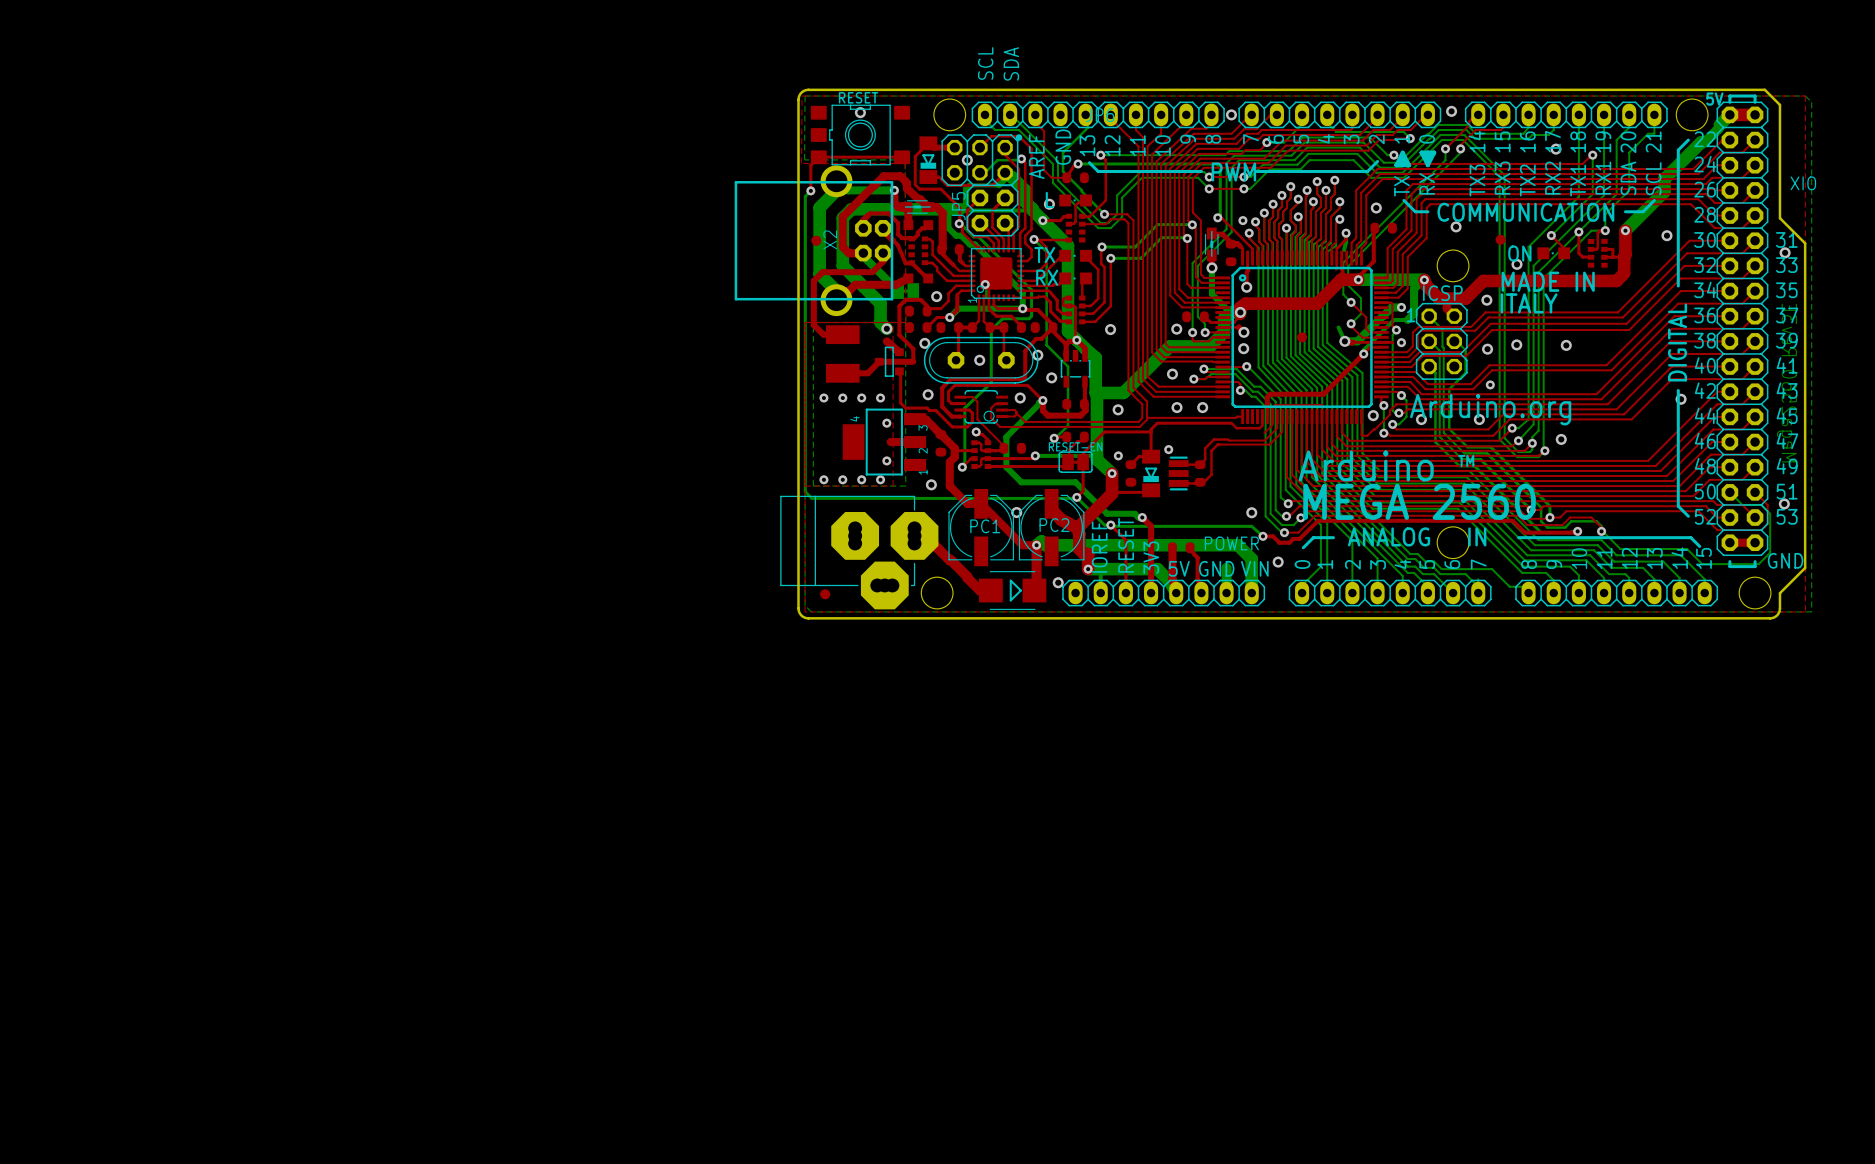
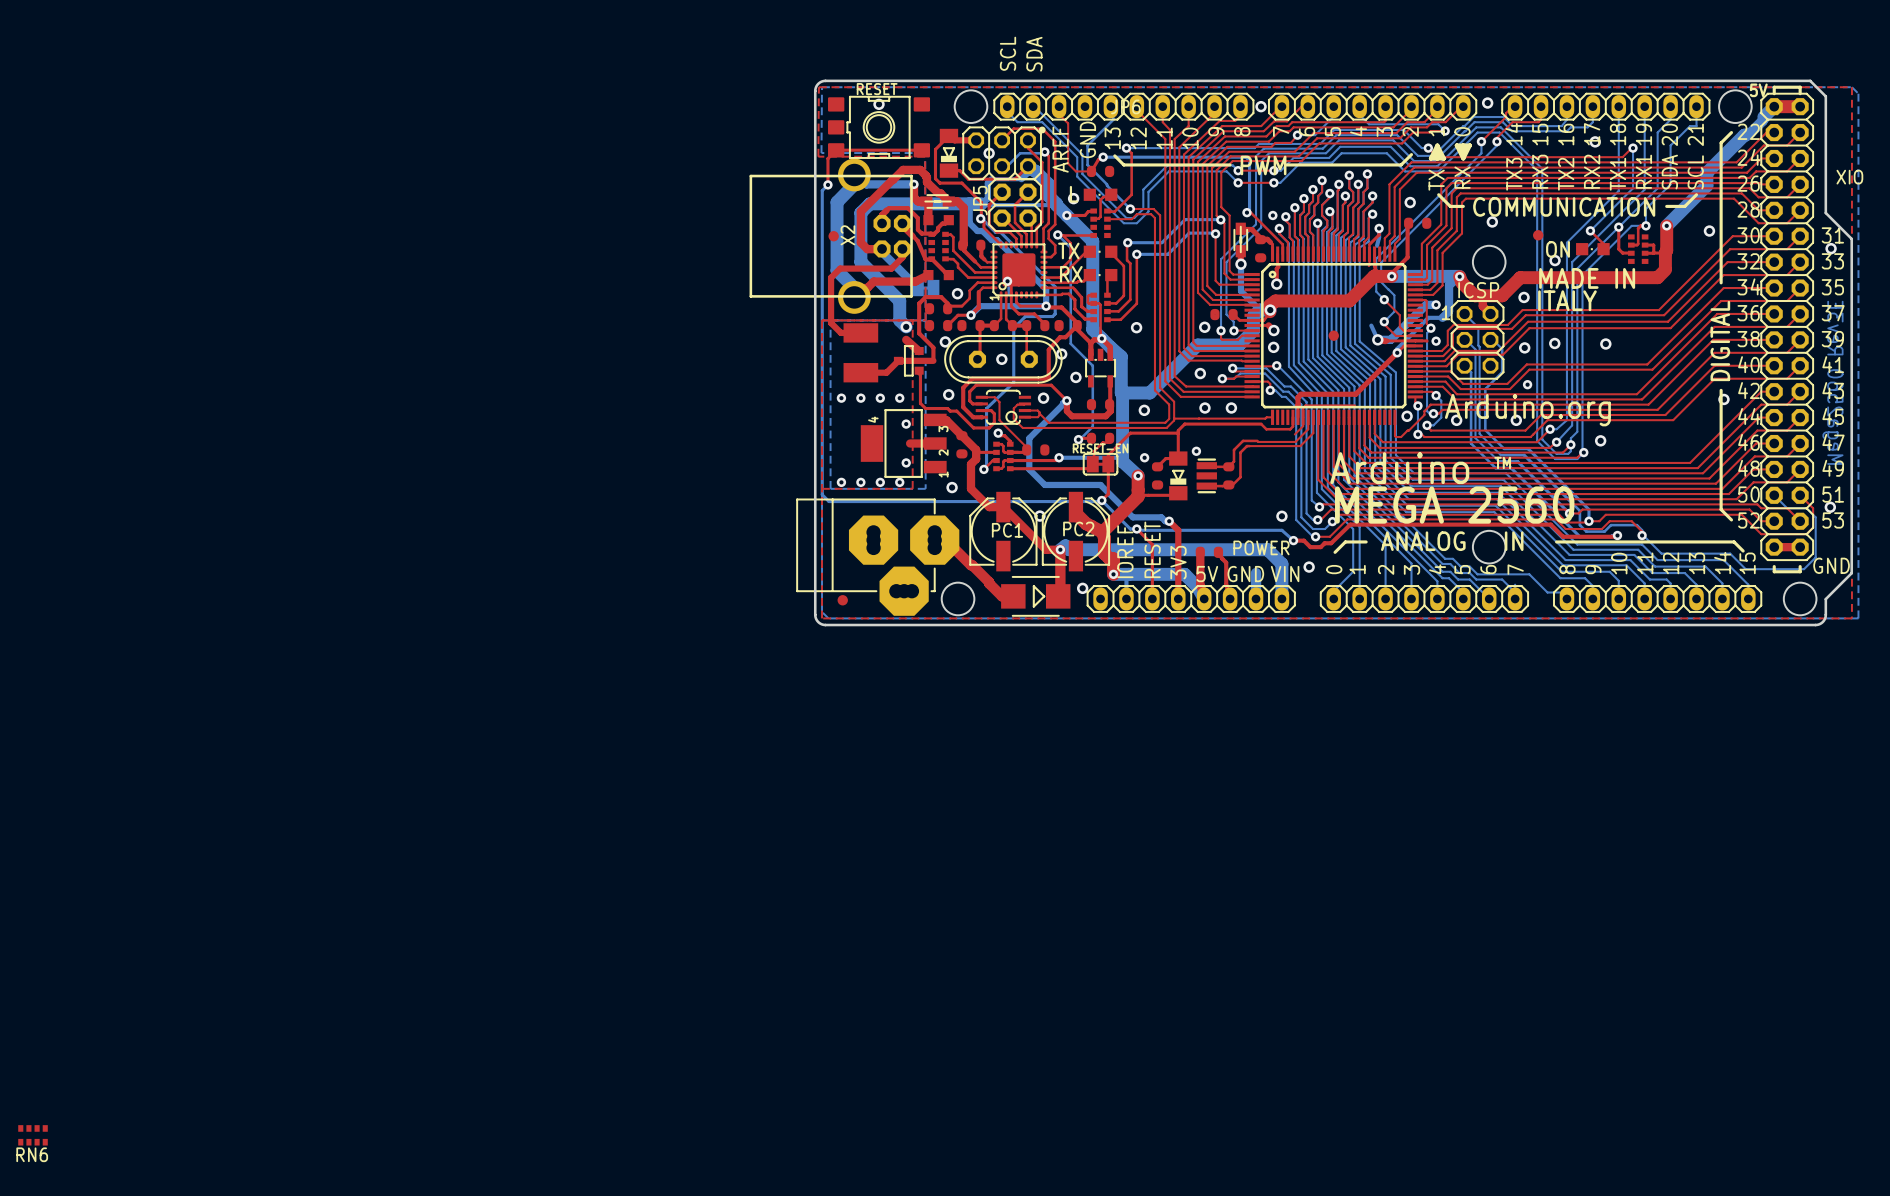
RN6: none -> (33, 1135)

